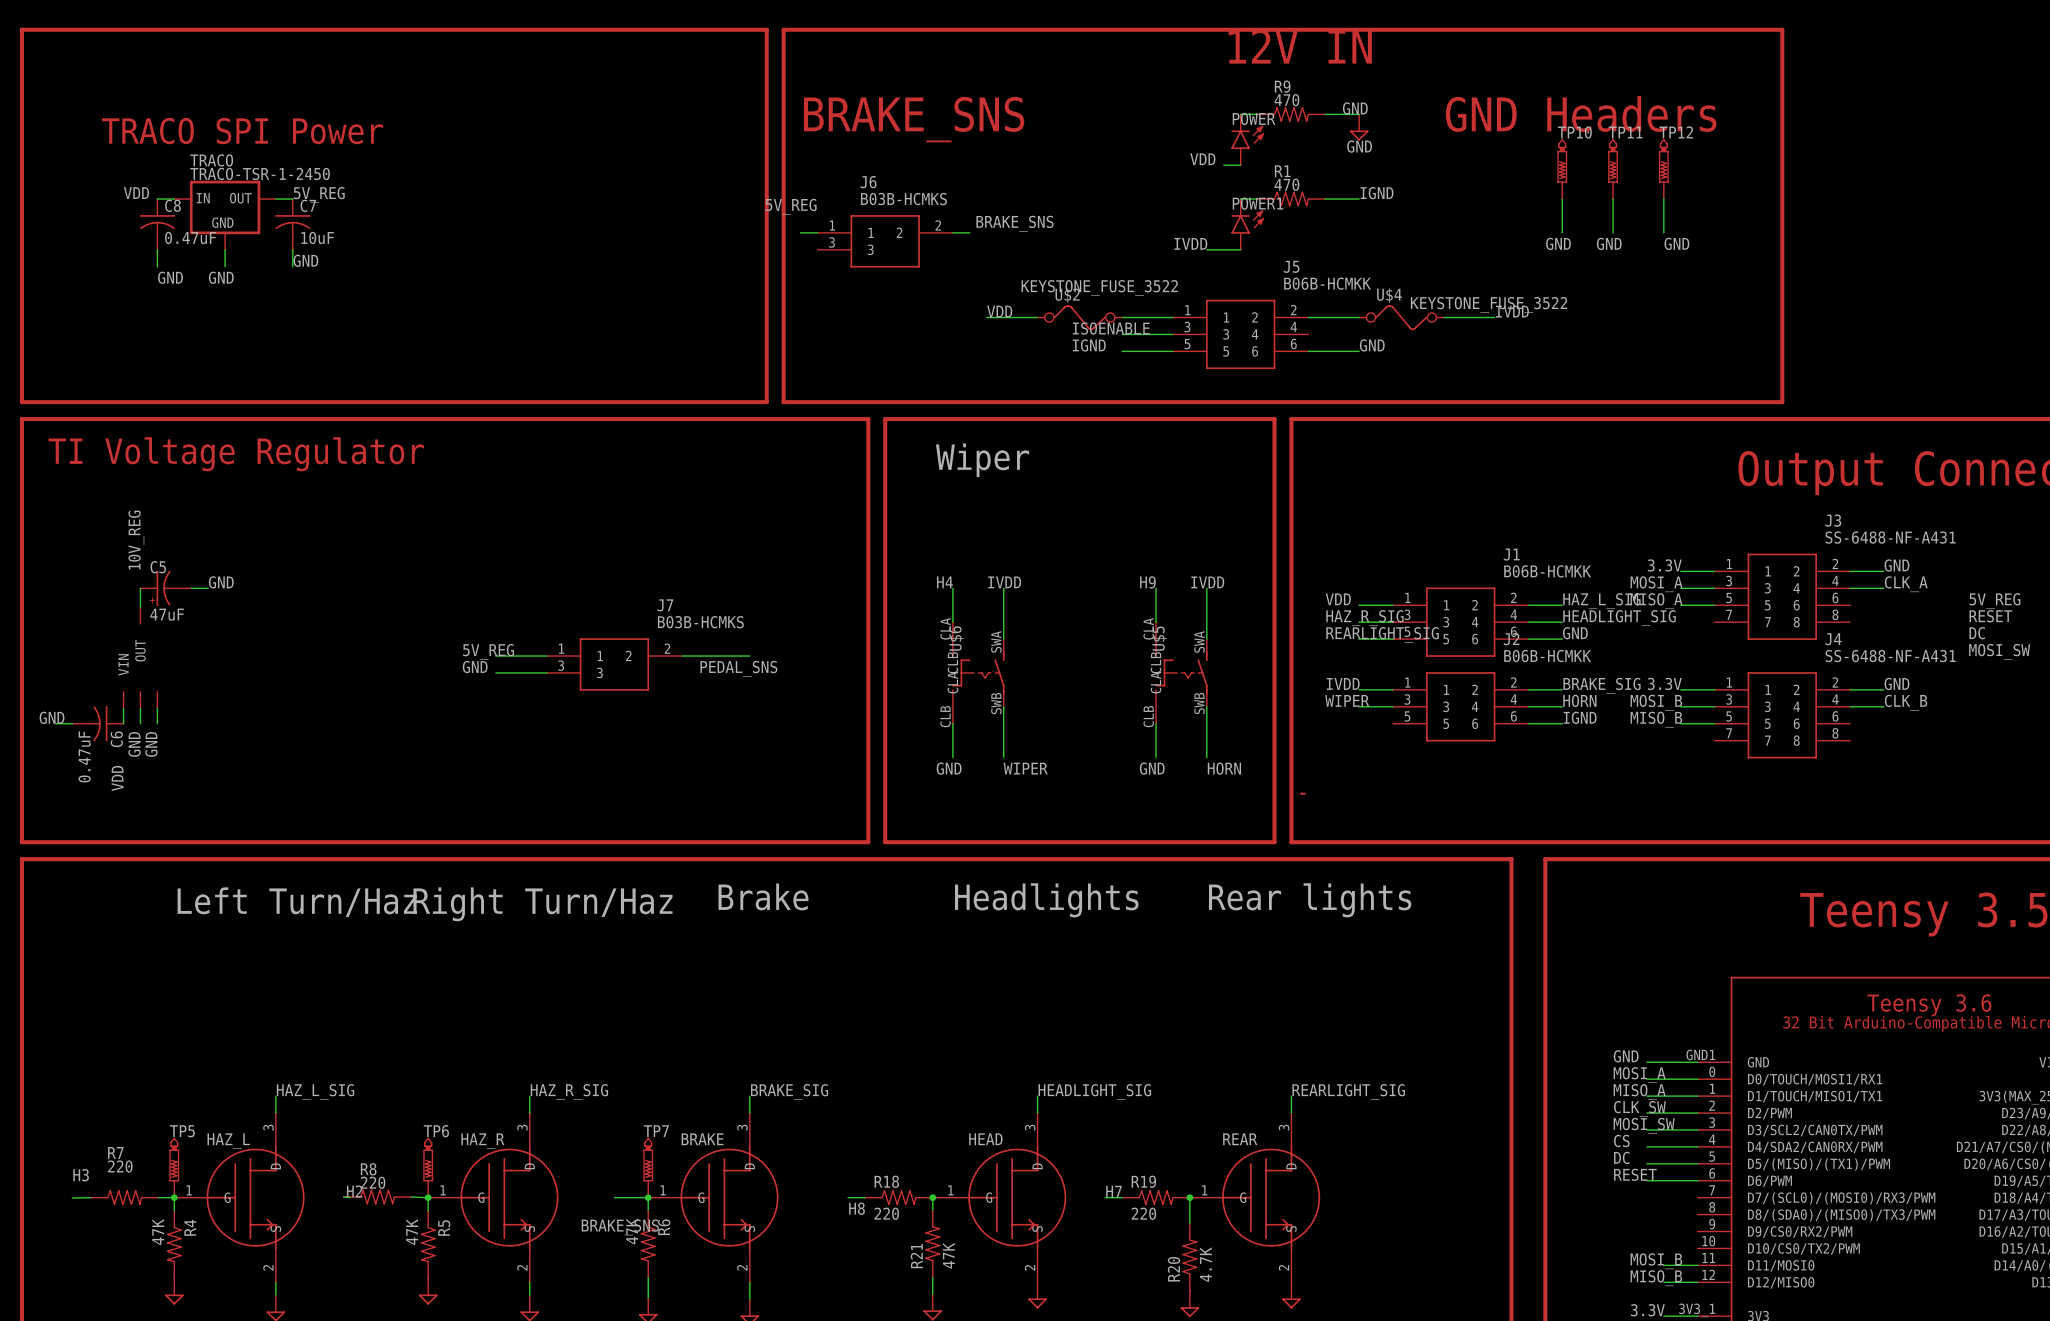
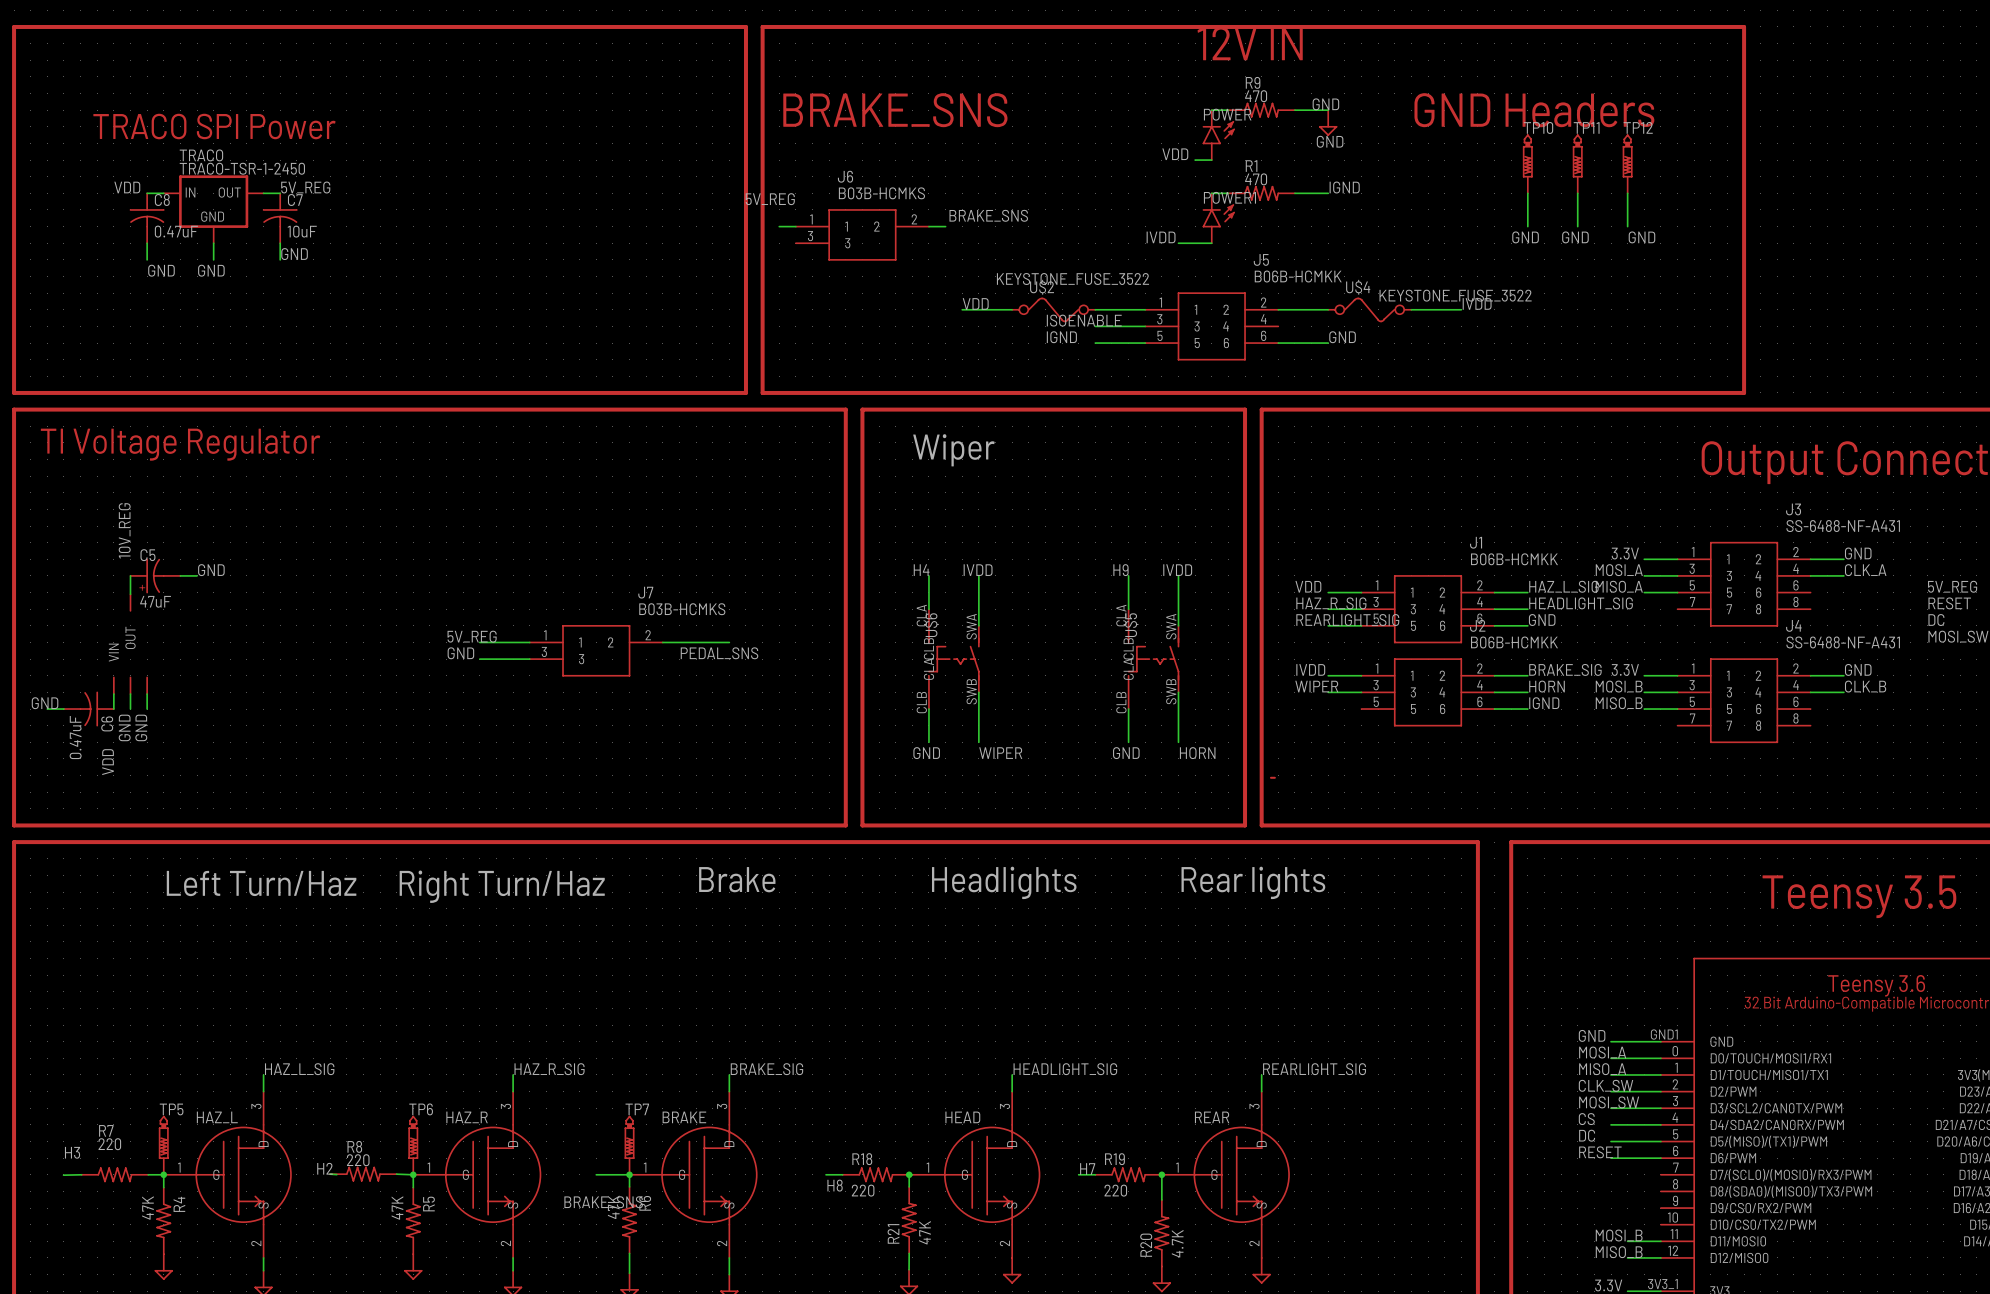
label position: H2 (354, 1191) -> H2 (324, 1168)

